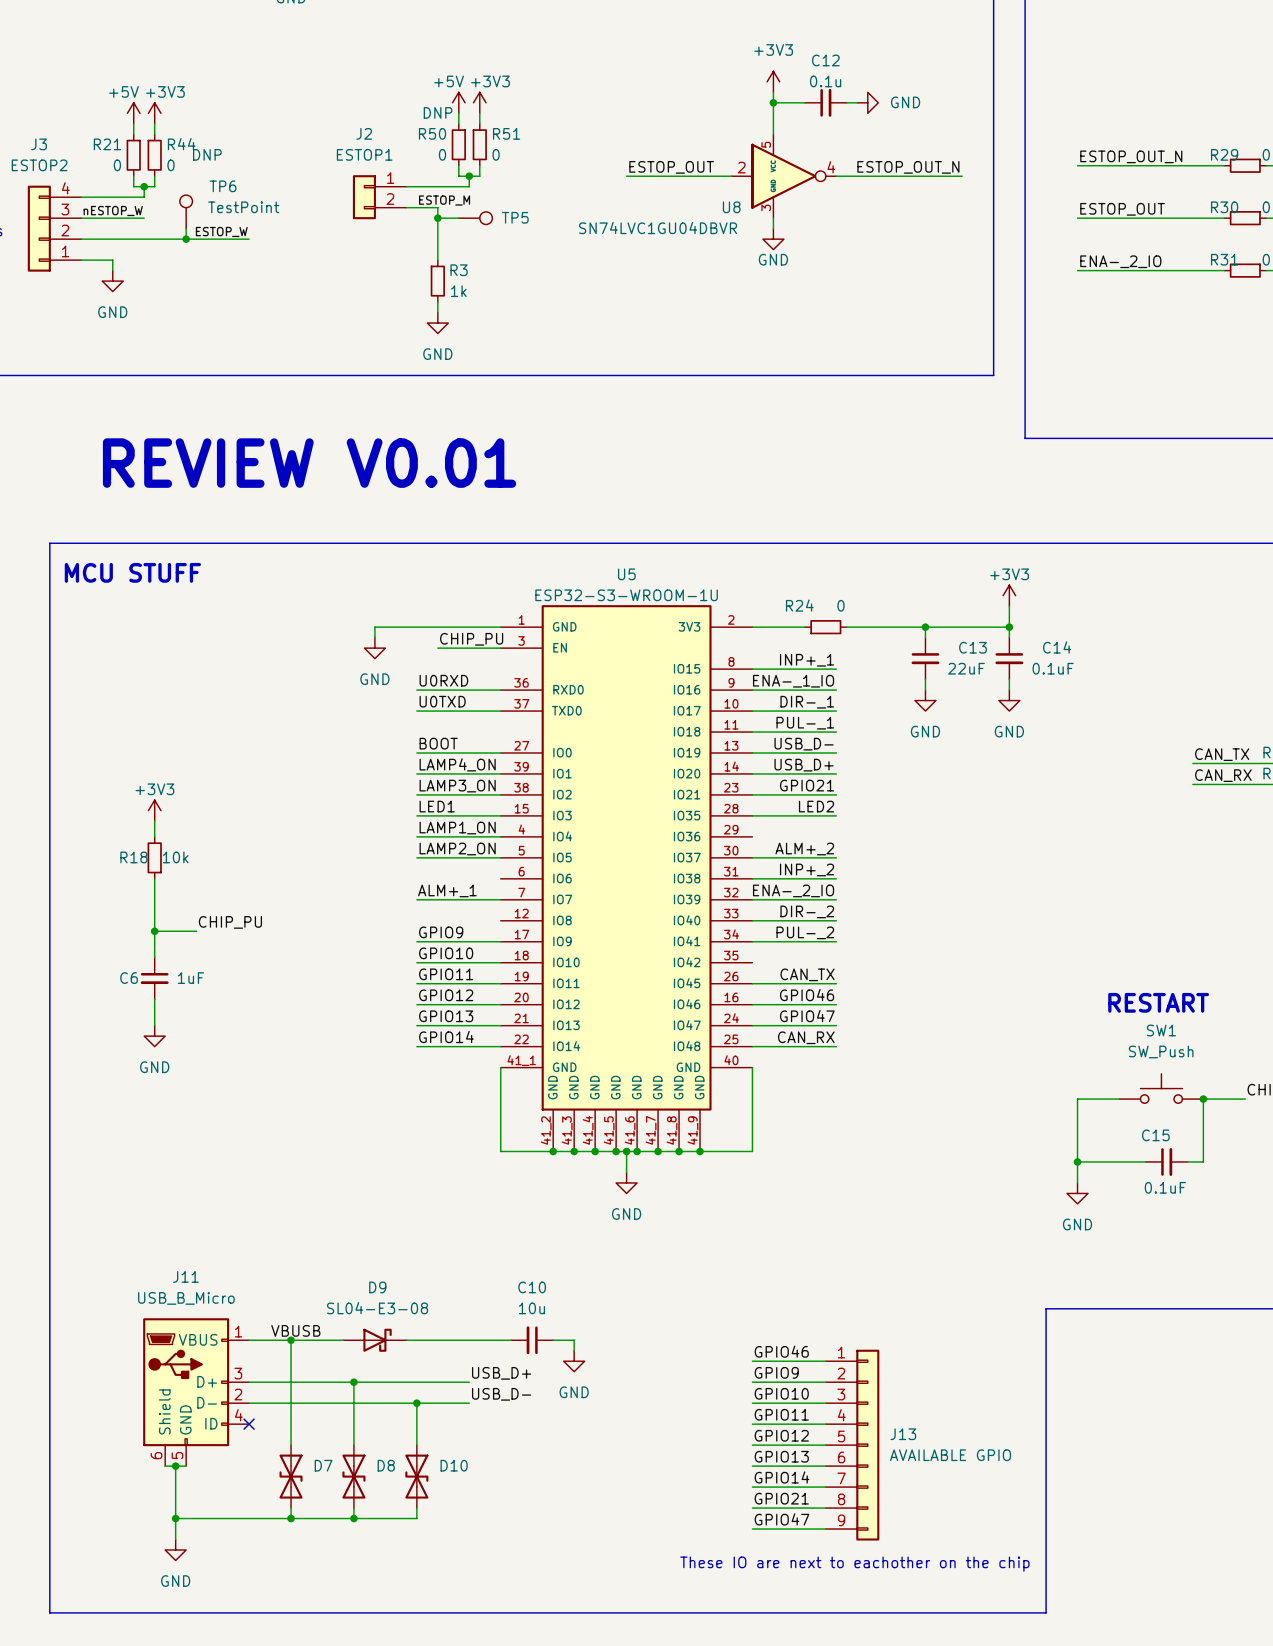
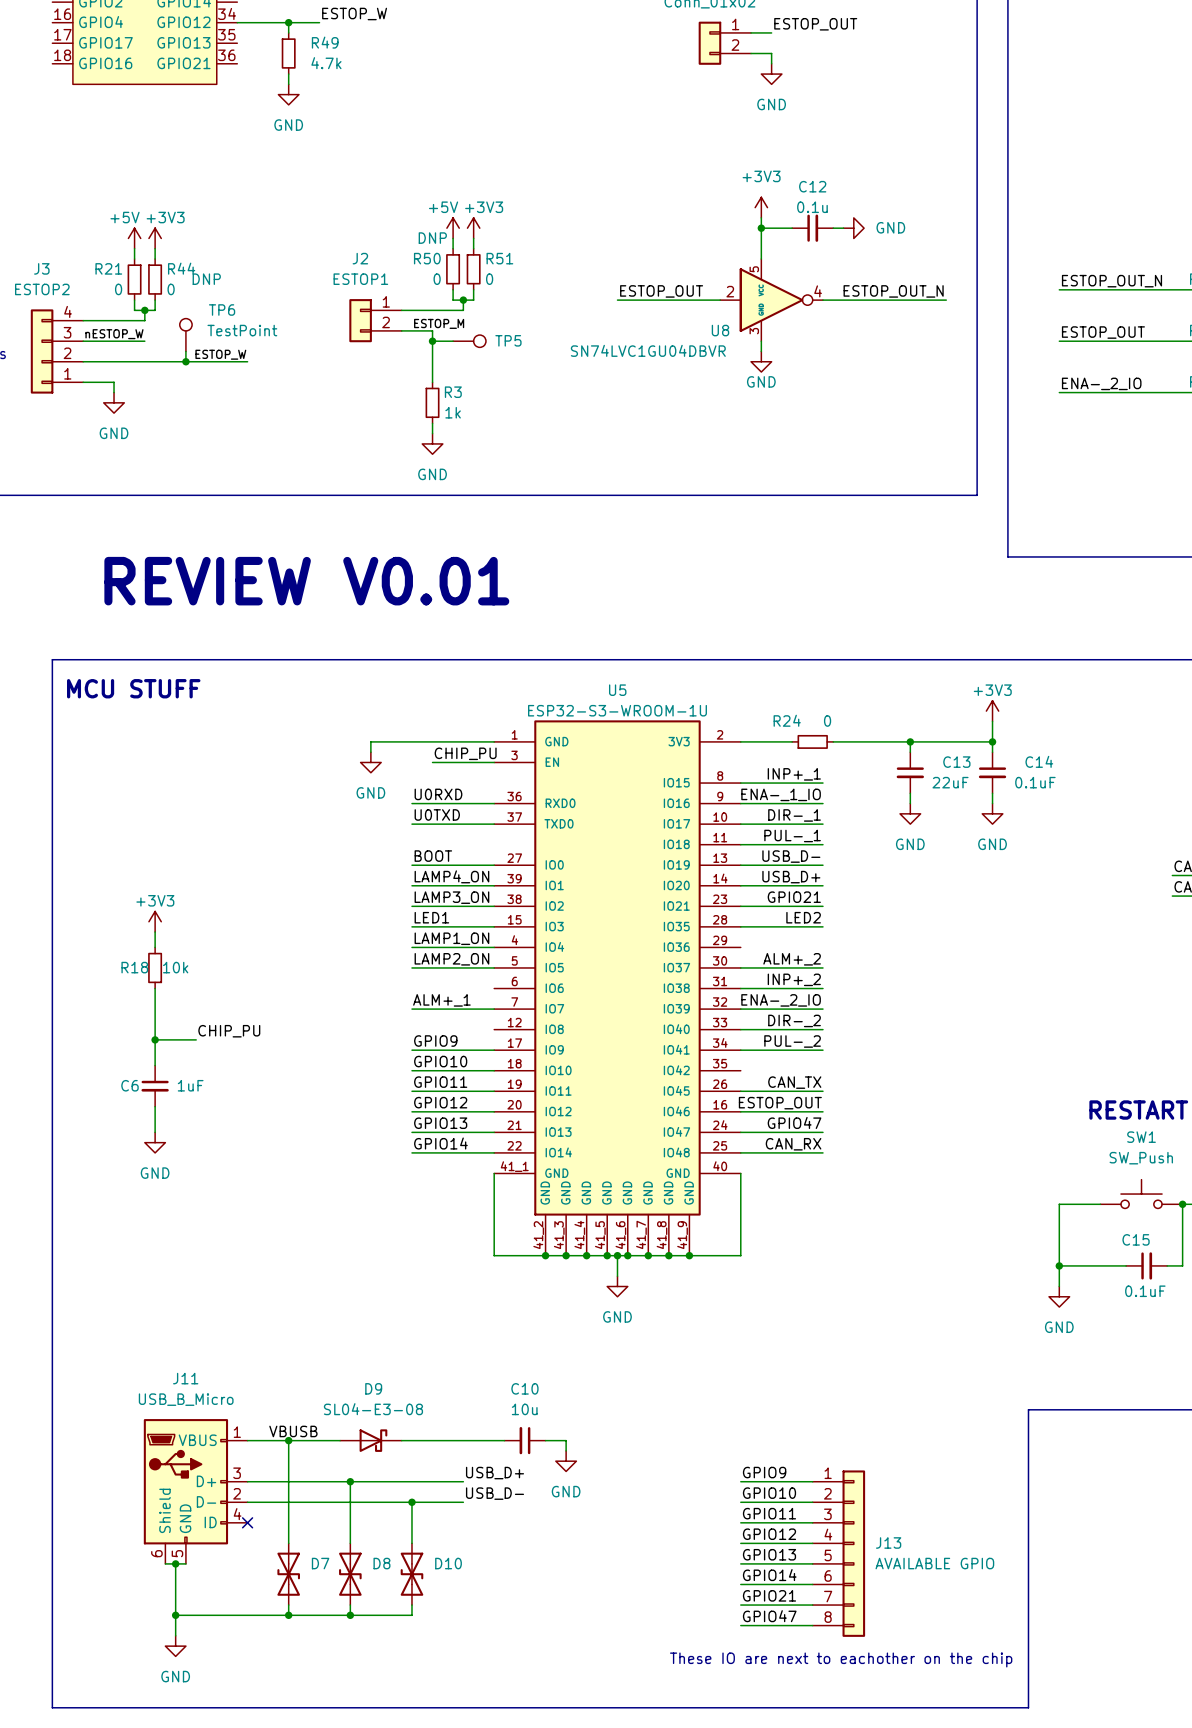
label: GPIO46 (807, 995) -> ESTOP_OUT (780, 1103)
J13 symbol: [825, 1349, 880, 1541] -> [812, 1470, 866, 1637]
label: GPIO46 (781, 1351) -> none
wire: (752, 1361) (825, 1361) -> none

